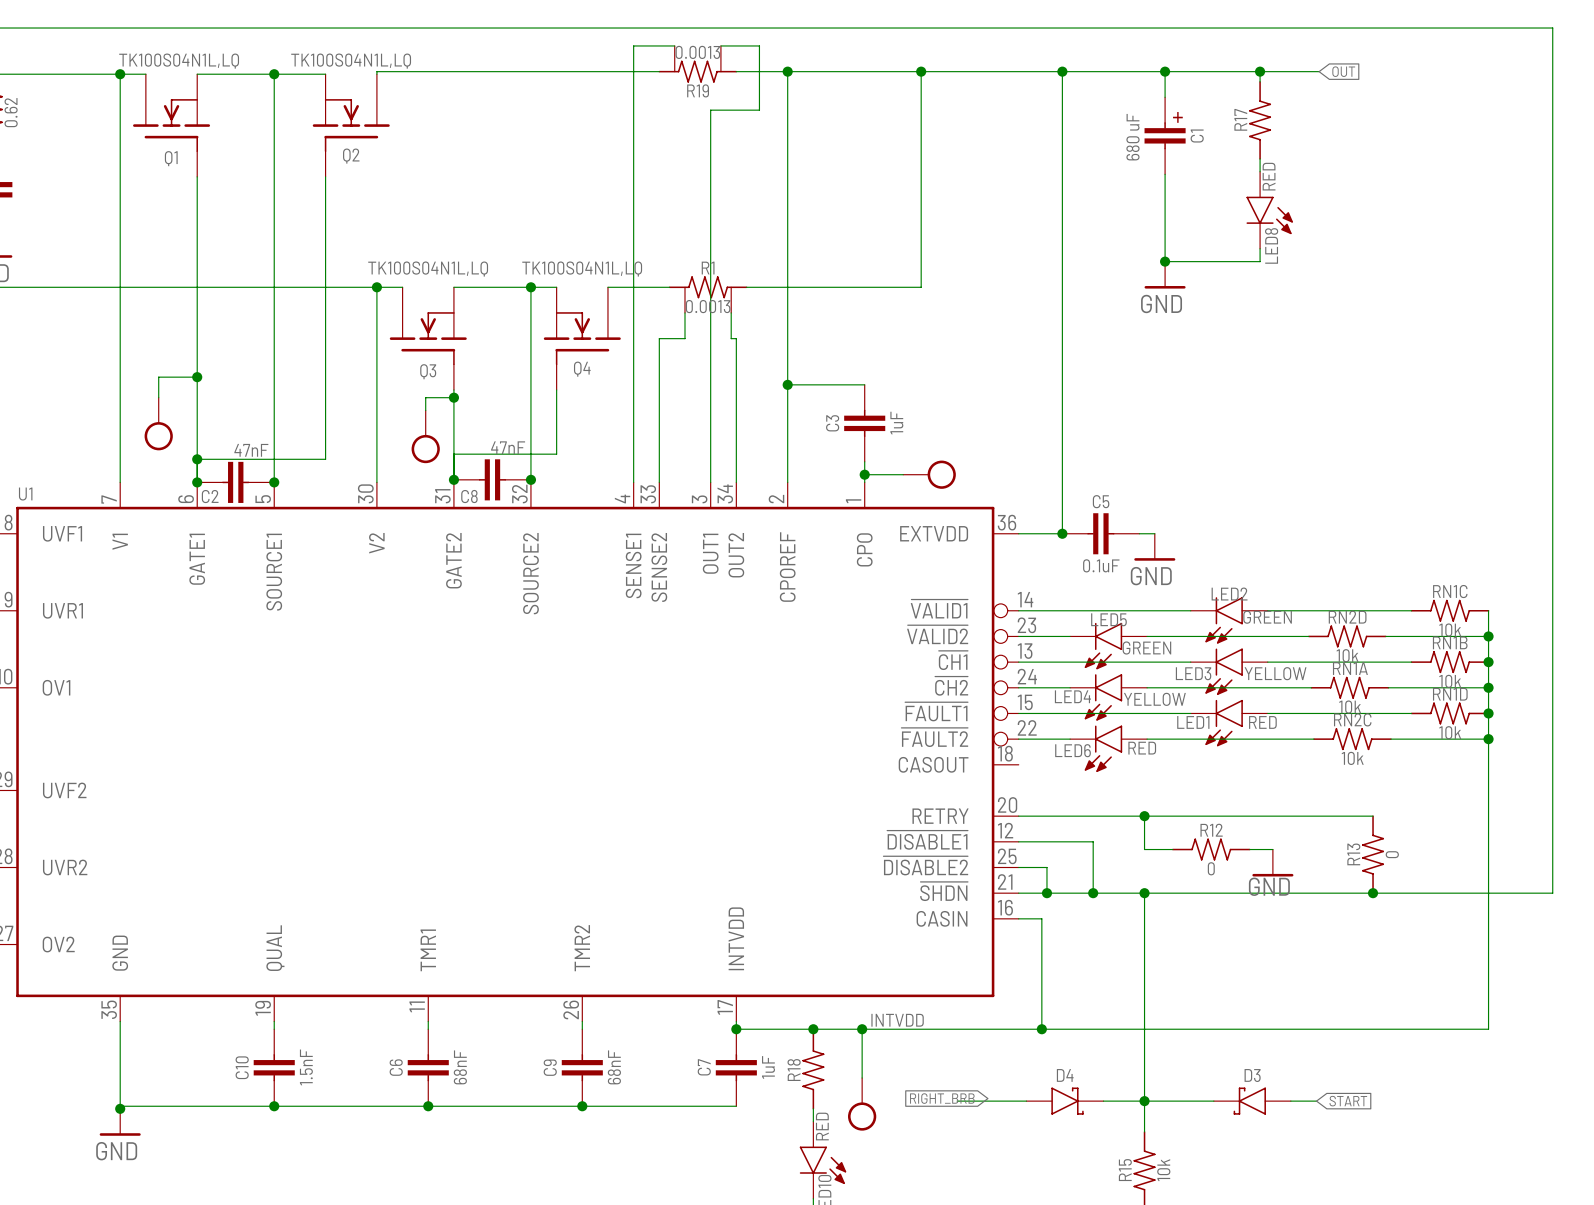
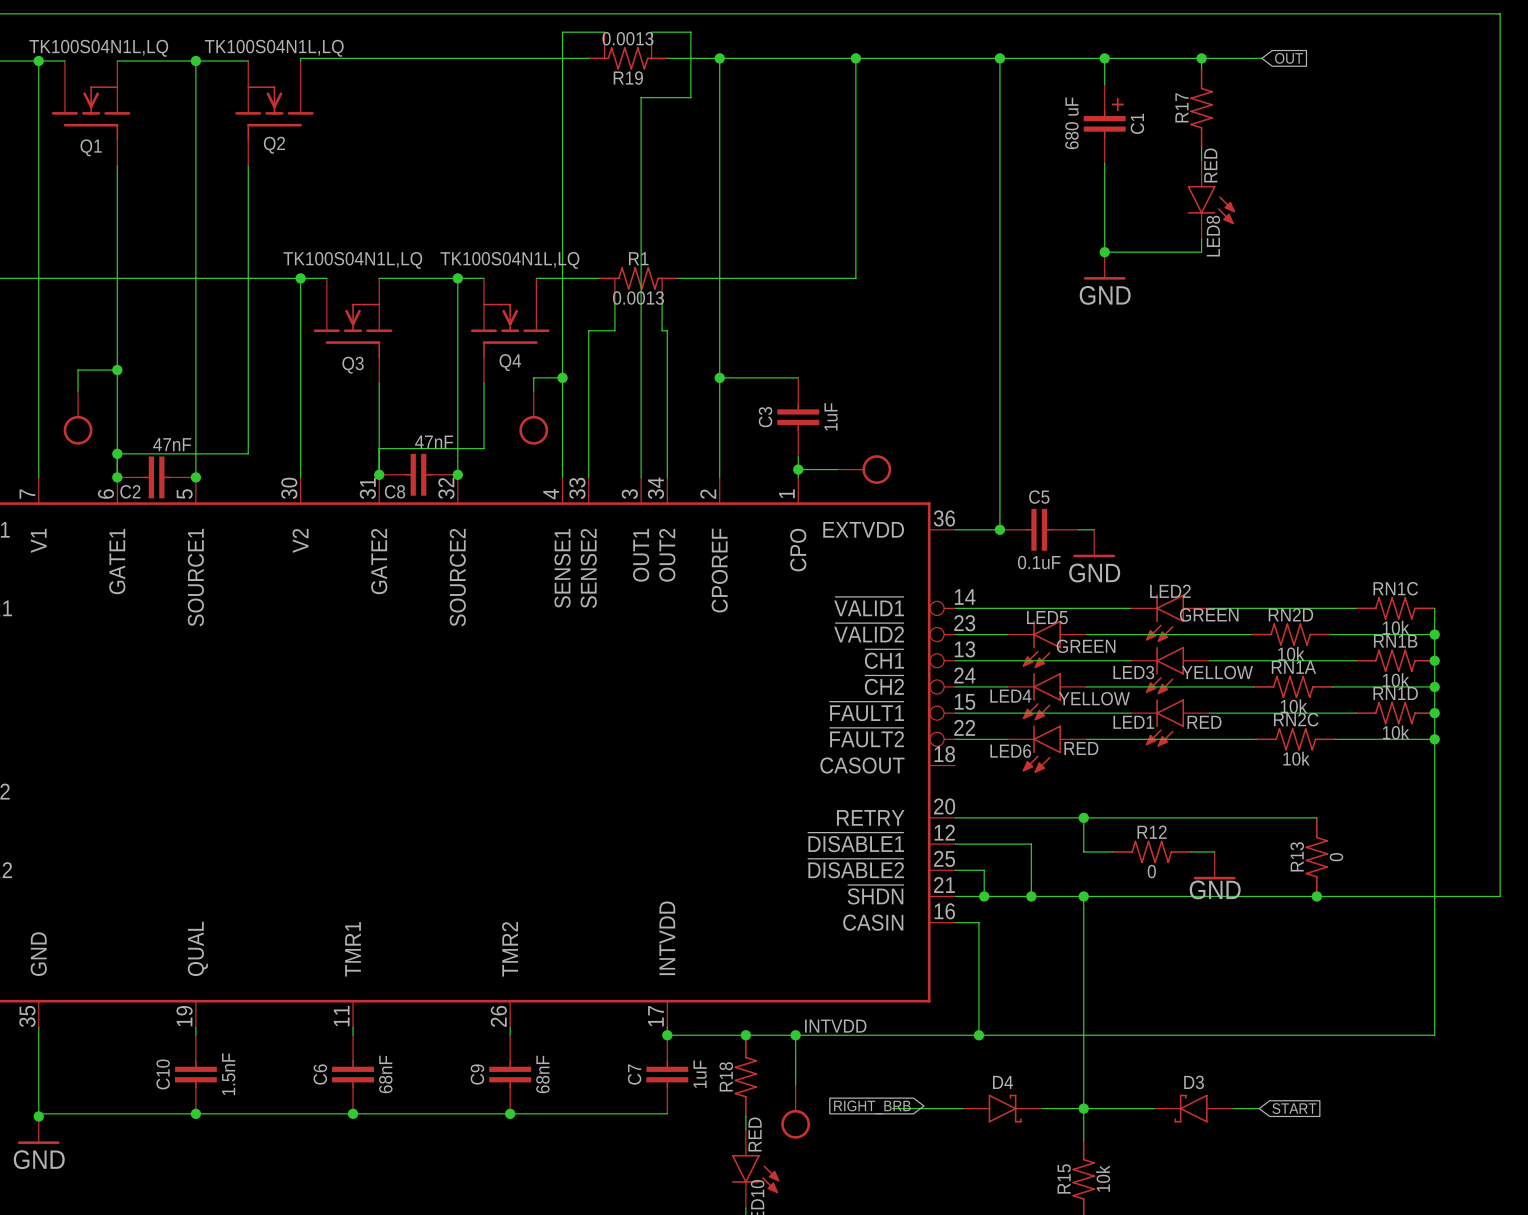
junction: none -> (562, 377)
wire: (453, 397) (425, 397) (425, 410) -> (562, 377) (533, 377) (533, 390)
junction: (453, 397) -> none
part position: (425, 436) -> (533, 417)

